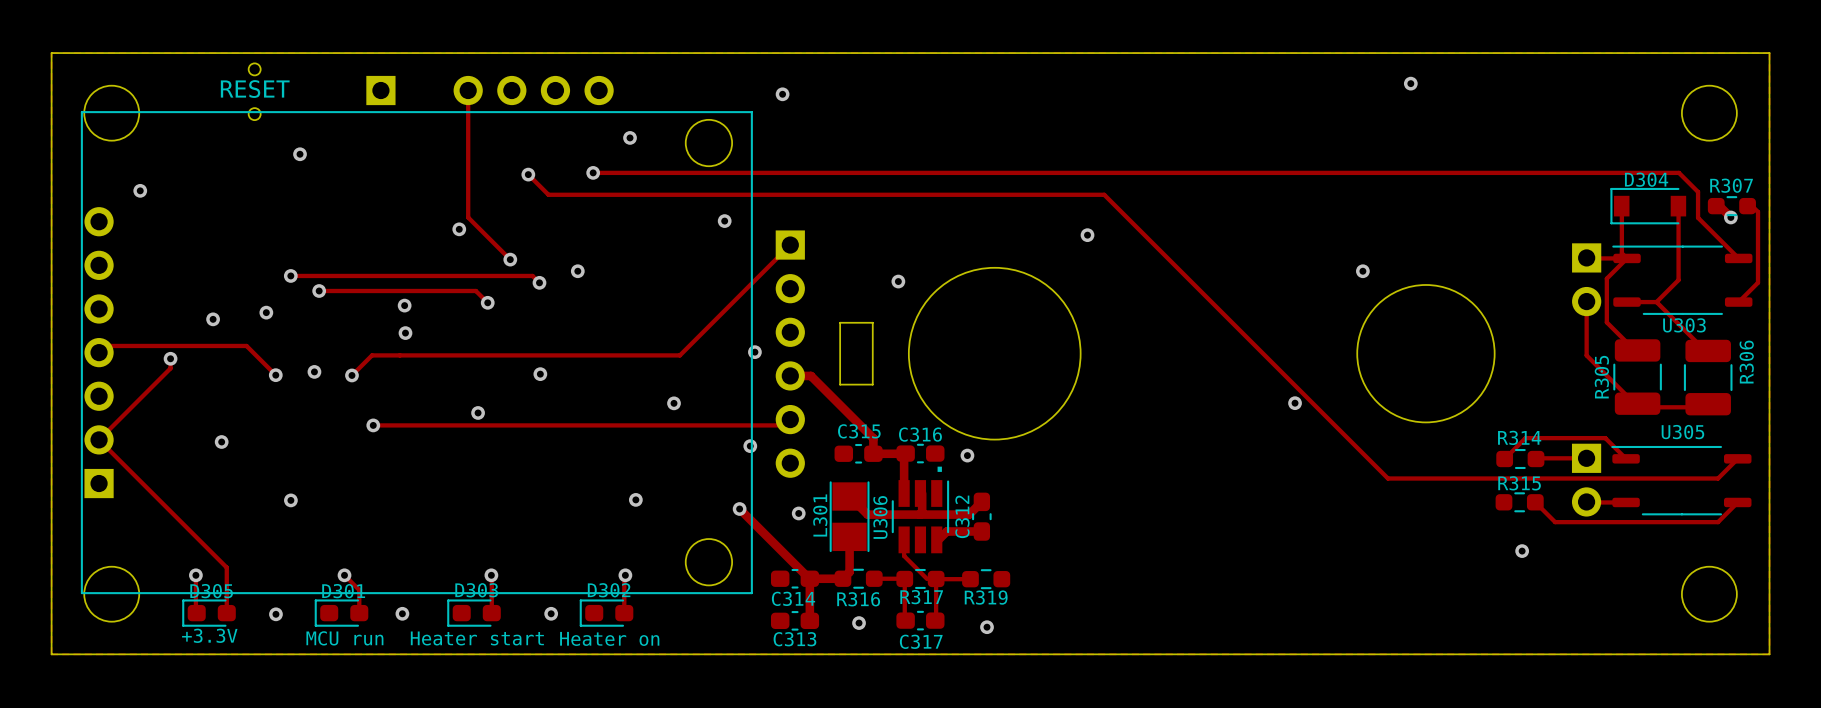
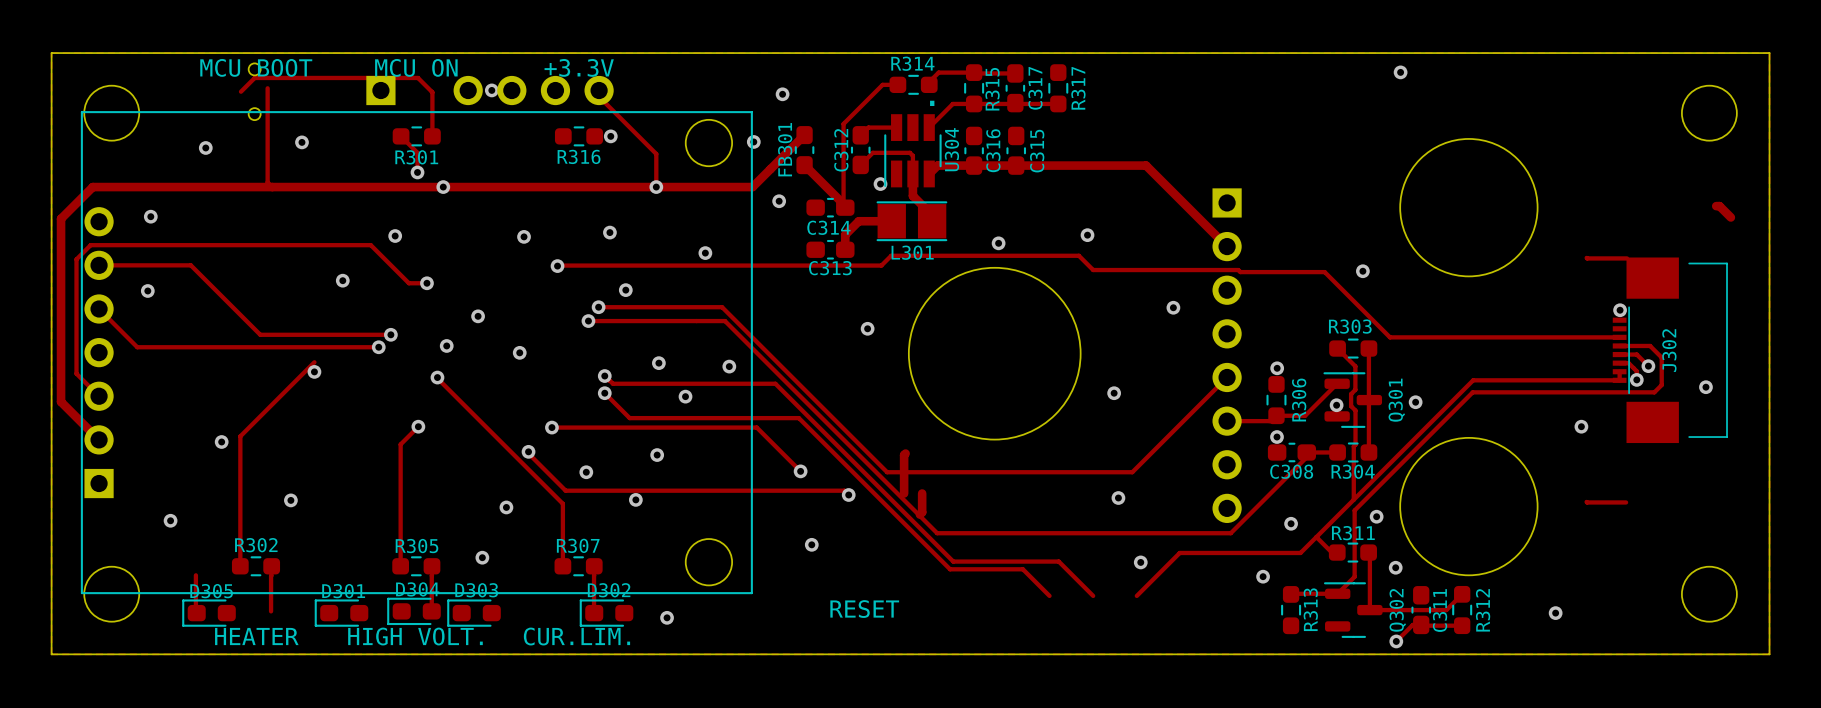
text: none -> MCU BOOT (256, 67)
text: none -> MCU ON (416, 67)
text: none -> +3.3V (579, 67)
track: none -> (1015, 73) (938, 72) (929, 82) (929, 84)
via position: (1410, 83) -> (1400, 72)
track: none -> (897, 84) (882, 84) (843, 123) (843, 205) (845, 207) (845, 205) (804, 165)
track: none -> (267, 88) (267, 182) (272, 187)
text: RESET (255, 89) -> none
track: (468, 90) (468, 217) (510, 259) -> none
via: none -> (491, 90)
track: none -> (241, 91) (254, 77) (418, 77) (432, 92) (432, 136)
track: none -> (594, 91) (656, 153) (656, 187)
track: none -> (1058, 103) (952, 103) (929, 127)
track: none -> (896, 127) (868, 127) (860, 135)
track: none -> (804, 135) (752, 187) (92, 187) (61, 218) (61, 401) (99, 439)
track: none -> (401, 136) (417, 152) (417, 172)
R301: none -> (416, 136)
via position: (630, 137) -> (610, 136)
round board edge: none -> [1399, 138, 1539, 278]
via: none -> (753, 141)
via: none -> (205, 147)
FB301: none -> (804, 150)
U304: none -> (912, 150)
via position: (300, 154) -> (301, 142)
track: none -> (860, 164) (872, 152) (909, 152) (912, 155) (912, 195) (932, 215) (932, 221)
via: none -> (417, 172)
track: (593, 172) (1678, 172) (1698, 191) (1698, 217) (1738, 258) -> none
via: (593, 172) -> none
track: none -> (929, 173) (937, 165) (1146, 165) (1227, 246)
track: (528, 174) (548, 194) (1104, 194) (1387, 478) (1718, 478) (1737, 458) -> none
via: (528, 174) -> none
via: none -> (880, 184)
via: none -> (443, 187)
via: none -> (656, 187)
D304 footprint: [1610, 187, 1687, 225] -> [387, 597, 441, 626]
via position: (140, 190) -> (150, 216)
via: none -> (779, 201)
track: (1621, 201) (1621, 253) (1627, 258) (1606, 278) (1606, 322) (1637, 353) -> none
track: (1678, 201) (1678, 280) (1656, 302) -> none
track: (1747, 201) (1758, 211) (1758, 282) (1738, 302) -> none
R307 position: (1731, 206) -> (578, 566)
via: (1730, 217) -> none
via: (724, 221) -> none
track: none -> (891, 221) (858, 221) (845, 234) (845, 249)
via: (459, 229) -> none
via: none -> (609, 232)
via: none -> (395, 236)
via: none -> (524, 236)
via: none -> (998, 243)
track: (790, 245) (679, 355) (372, 355) (351, 375) -> none
via: none -> (705, 253)
via: (510, 259) -> none
track: none -> (99, 265) (190, 265) (260, 334) (390, 334)
track: none -> (557, 266) (881, 265) (891, 255) (1078, 255) (1093, 270) (1324, 272) (1389, 337) (1619, 337)
via: none -> (557, 266)
via: (577, 271) -> none
track: (290, 275) (532, 275) (539, 282) -> none
via: (290, 275) -> none
part: (1586, 279) -> none
U303: (1682, 280) -> none
via: (898, 281) -> none
via: (539, 282) -> none
track: none -> (426, 283) (408, 283) (370, 245) (90, 245) (76, 259) (76, 373) (99, 396)
via: none -> (426, 283)
round board edge: [1356, 284, 1496, 424] -> none
via: none -> (147, 290)
track: (319, 290) (475, 290) (487, 302) -> none
via position: (319, 290) -> (342, 280)
via: none -> (625, 290)
track: (1586, 301) (1586, 355) (1638, 407) (1708, 407) -> none
via position: (487, 302) -> (478, 316)
track: (1627, 302) (1656, 302) -> none
track: (1656, 302) (1708, 354) -> none
via: (404, 305) -> none
track: none -> (598, 307) (722, 307) (887, 472) (1132, 472) (1227, 377)
via: none -> (598, 307)
via: none -> (1173, 307)
track: none -> (99, 308) (137, 347) (378, 347)
via: none -> (1620, 310)
via: (266, 312) -> none
via: (213, 319) -> none
track: none -> (588, 321) (725, 321) (937, 533) (1230, 533) (1306, 457) (1306, 452) (1337, 452)
via: none -> (588, 321)
board edge: (840, 322) (872, 322) (872, 384) (840, 384) (840, 322) -> none
via: none -> (867, 328)
via position: (405, 333) -> (390, 334)
R305 footprint: [1613, 339, 1662, 415] -> [392, 556, 441, 577]
R306 footprint: [1683, 339, 1733, 416] -> [1266, 376, 1287, 425]
via: none -> (446, 345)
track: none -> (1619, 345) (1650, 345) (1661, 357) (1661, 385) (1654, 392) (1472, 392) (1354, 510) (1354, 576) (1337, 593) (1291, 594)
via: none -> (378, 347)
track: none -> (1337, 348) (1355, 366) (1355, 389) (1351, 394) (1351, 406) (1355, 410) (1353, 499)
R303: none -> (1353, 348)
track: none -> (1368, 348) (1368, 452)
J302: none -> (1670, 350)
track: (99, 352) (105, 345) (246, 345) (275, 375) -> none
via: none -> (519, 352)
via position: (754, 352) -> (729, 366)
part: (790, 354) -> none
track: none -> (1619, 354) (1636, 354) (1648, 366)
part: none -> (1227, 355)
track: (170, 358) (170, 368) (99, 439) (226, 567) (226, 613) -> none
via: (170, 358) -> none
track: none -> (314, 362) (240, 436) (240, 561)
via: none -> (658, 363)
track: none -> (1619, 363) (1628, 363) (1636, 371) (1636, 379)
via: none -> (1648, 366)
via: none -> (1277, 368)
track: none -> (1619, 371) (1619, 380) (1473, 380) (1300, 552) (1179, 552) (1136, 595)
via: (540, 374) -> none
via: (275, 375) -> none
via: (351, 375) -> none
track: (790, 375) (810, 375) (873, 438) (873, 453) (905, 453) -> none
track: none -> (604, 376) (612, 383) (775, 383) (953, 561) (1058, 561) (1093, 595)
via: none -> (604, 376)
track: none -> (437, 377) (562, 503) (562, 566)
via: none -> (437, 377)
R305 name position: R305 (1601, 377) -> R305 (416, 546)
via: none -> (1636, 379)
track: none -> (1337, 383) (1305, 415) (1276, 415)
via: none -> (1705, 387)
track: none -> (604, 393) (629, 418) (798, 418) (950, 569) (1022, 569) (1049, 595)
via: none -> (604, 393)
via: none -> (1114, 393)
Q301: none -> (1352, 400)
via: none -> (1415, 402)
via position: (674, 403) -> (685, 396)
via: (1295, 403) -> none
via: none -> (1336, 405)
via: (478, 412) -> none
track: none -> (1274, 415) (1269, 421) (1227, 421)
track: (790, 419) (784, 425) (373, 425) -> none
via: (373, 425) -> none
track: none -> (418, 426) (400, 444) (400, 561)
via: none -> (418, 426)
via: none -> (1581, 426)
track: none -> (551, 427) (756, 427) (800, 471)
via: none -> (551, 427)
via: none -> (1276, 437)
round board edge: none -> [1399, 437, 1539, 577]
via: (750, 446) -> none
track: none -> (528, 451) (565, 490) (844, 490) (848, 494)
via: none -> (528, 451)
C308: none -> (1291, 452)
R304: none -> (1353, 452)
C315 rotation: 0° (858, 453) -> 90° clockwise (1016, 150)
C315 position: (858, 453) -> (1016, 150)
C316 rotation: 0° (920, 453) -> 90° clockwise (974, 150)
C316 position: (920, 453) -> (974, 150)
via: none -> (657, 455)
via: (967, 455) -> none
track: (1586, 458) (1536, 459) -> none
track: (1626, 458) (1605, 438) (1525, 438) (1504, 459) -> none
R314 position: (1520, 459) -> (913, 84)
text position: . (939, 469) -> . (932, 103)
via: none -> (800, 471)
via: none -> (586, 472)
part: (1586, 480) -> none
U305: (1681, 480) -> none
via: none -> (848, 494)
track: (849, 496) (867, 514) (969, 514) (981, 501) -> none
via: none -> (1118, 498)
R315 rotation: 0° (1519, 502) -> 90° clockwise (974, 88)
R315 position: (1519, 502) -> (974, 88)
track: (1535, 502) (1555, 522) (1718, 522) (1737, 502) -> none
via: none -> (506, 507)
track: (739, 509) (809, 578) -> none
via: (739, 509) -> none
via: (798, 513) -> none
L301 name position: L301 (820, 515) -> L301 (912, 252)
L301 rotation: 0° (849, 516) -> 90° clockwise (911, 221)
L301 position: (849, 516) -> (911, 221)
U306: (920, 516) -> none
C312 position: (981, 516) -> (860, 150)
via: none -> (1376, 516)
via: none -> (1291, 523)
track: (981, 531) (946, 531) (938, 539) -> none
track: (849, 536) (849, 572) (842, 578) (809, 578) (809, 620) -> none
track: none -> (1316, 537) (1331, 552) (1337, 552)
track: (904, 539) (904, 555) (927, 578) -> none
via: none -> (811, 544)
via: (1522, 551) -> none
R311: none -> (1352, 552)
track: none -> (1368, 552) (1369, 610) (1446, 610) (1462, 594)
via: none -> (1140, 562)
R302: none -> (255, 566)
via: none -> (1395, 567)
via position: (195, 575) -> (170, 520)
track: none -> (271, 575) (271, 611)
track: (344, 575) (359, 590) (359, 613) -> none
via: (344, 575) -> none
track: none -> (432, 575) (431, 611)
track: (491, 575) (491, 613) -> none
via position: (491, 575) -> (482, 557)
track: none -> (594, 575) (594, 611)
track: (625, 575) (624, 613) -> none
via: (625, 575) -> none
via: none -> (1263, 576)
C314 position: (795, 578) -> (830, 207)
R316 position: (858, 578) -> (579, 136)
track: (874, 578) (904, 578) -> none
track: (904, 578) (905, 620) -> none
R317 rotation: 0° (920, 578) -> 90° clockwise (1058, 88)
R317 position: (920, 578) -> (1058, 88)
track: (936, 578) (935, 620) -> none
track: (936, 579) (970, 579) -> none
R319: (986, 579) -> none
text: none -> RESET (864, 609)
R313: none -> (1291, 610)
Q302: none -> (1353, 610)
C311: none -> (1421, 610)
R312: none -> (1462, 610)
via: (402, 613) -> none
via: (551, 613) -> none
via: none -> (1555, 613)
via: (275, 614) -> none
via: none -> (667, 617)
C313 position: (795, 620) -> (830, 249)
C317 rotation: 0° (920, 620) -> 90° clockwise (1015, 88)
C317 position: (920, 620) -> (1015, 88)
via: (859, 623) -> none
track: none -> (1462, 625) (1412, 624) (1396, 641)
via: (987, 627) -> none
text: +3.3V (209, 635) -> none
text: none -> HEATER (256, 636)
text: none -> HIGH VOLT. (415, 636)
text: none -> CUR.LIM. (576, 636)
text: MCU run (344, 638) -> none
text: Heater start (477, 638) -> none
text: Heater on (609, 638) -> none
via: none -> (1396, 641)

